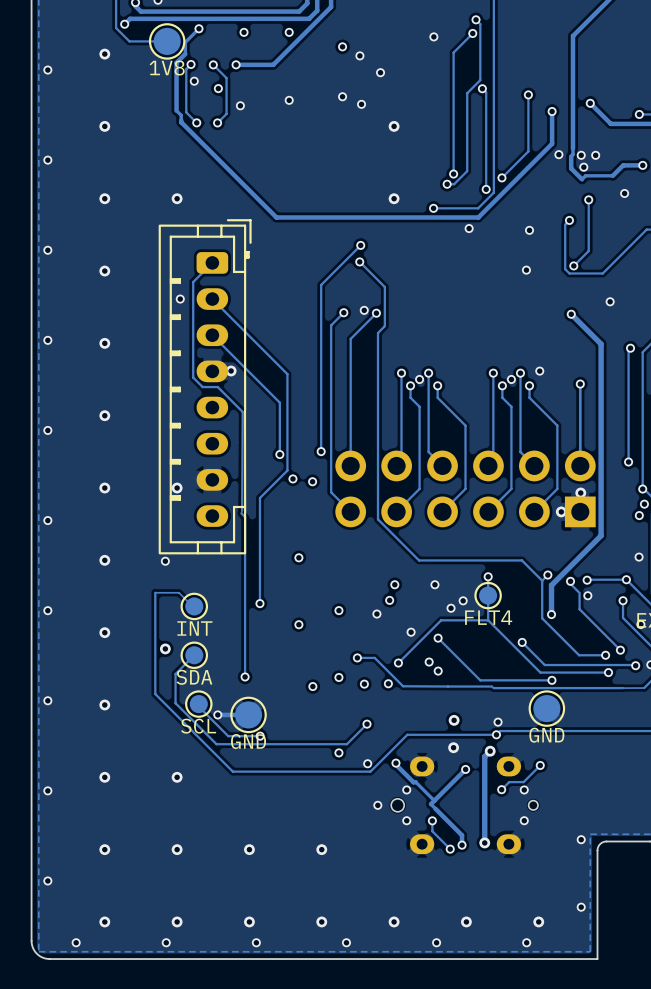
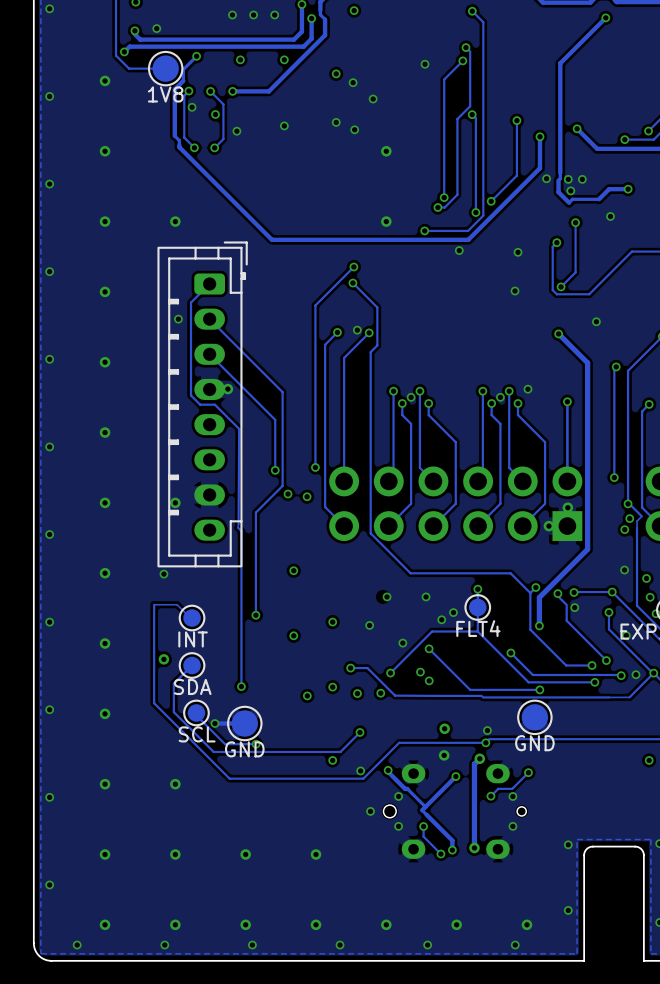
via: (389, 600) -> none

